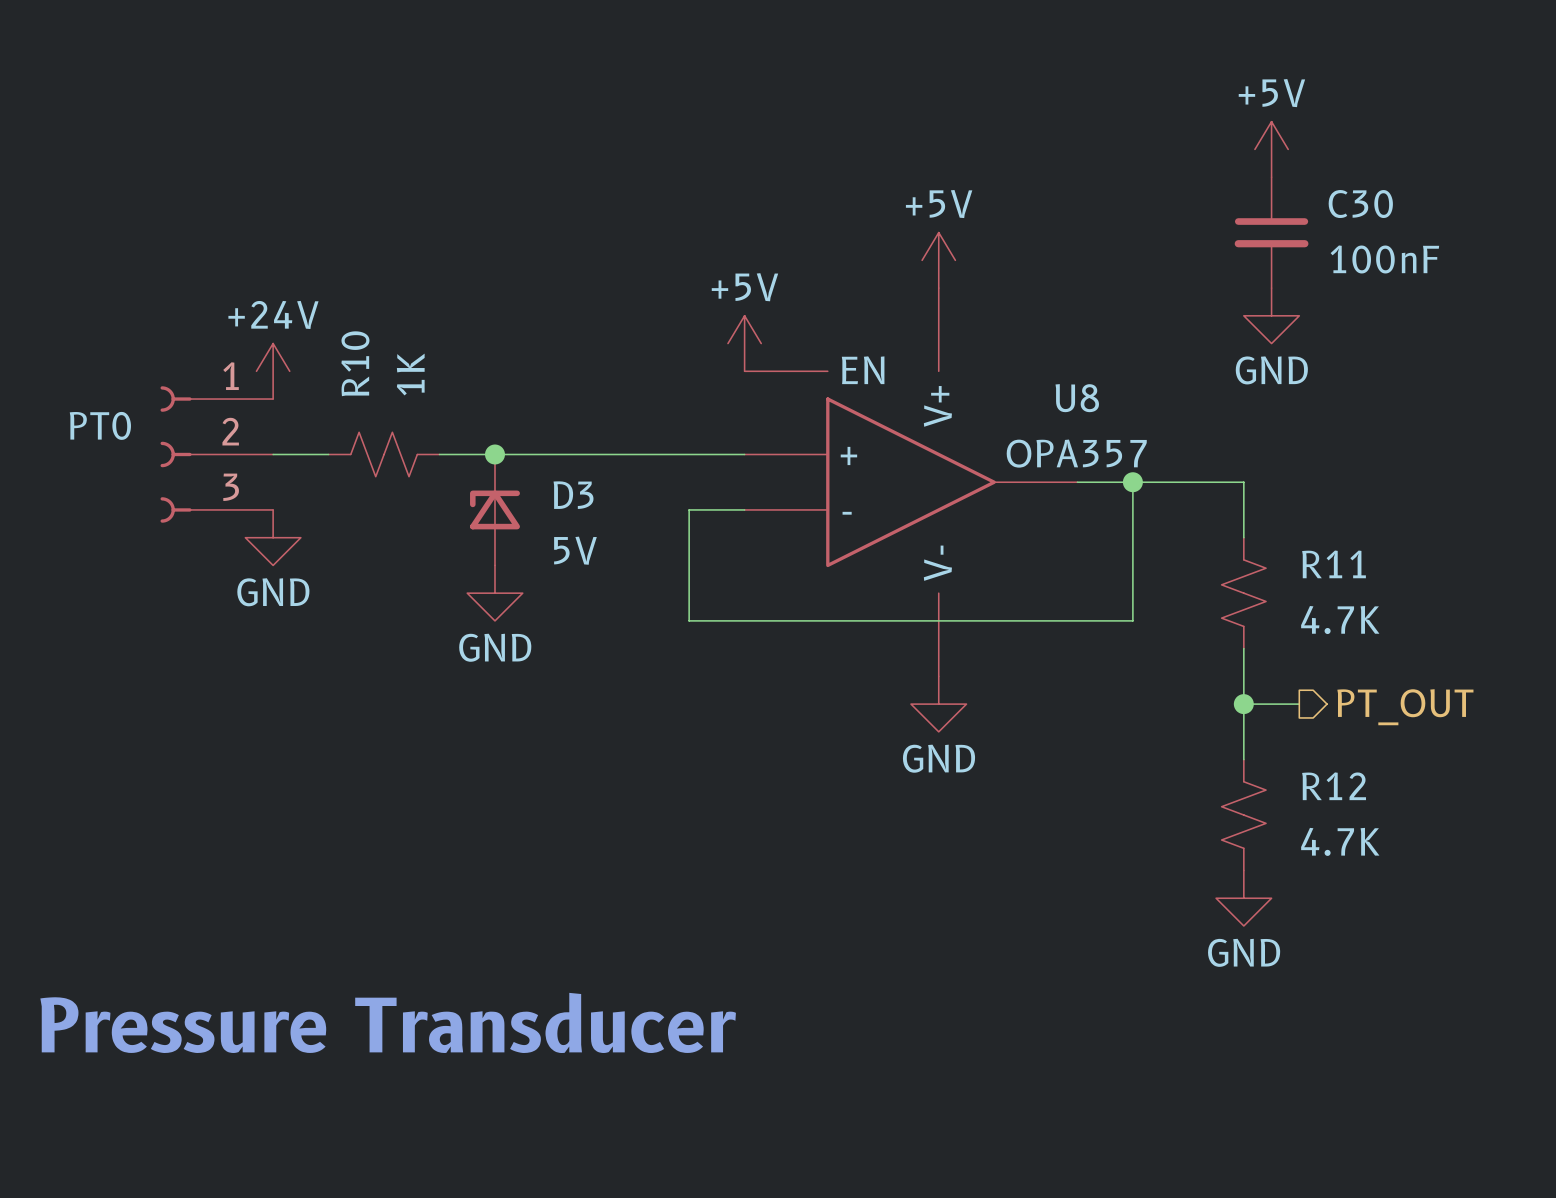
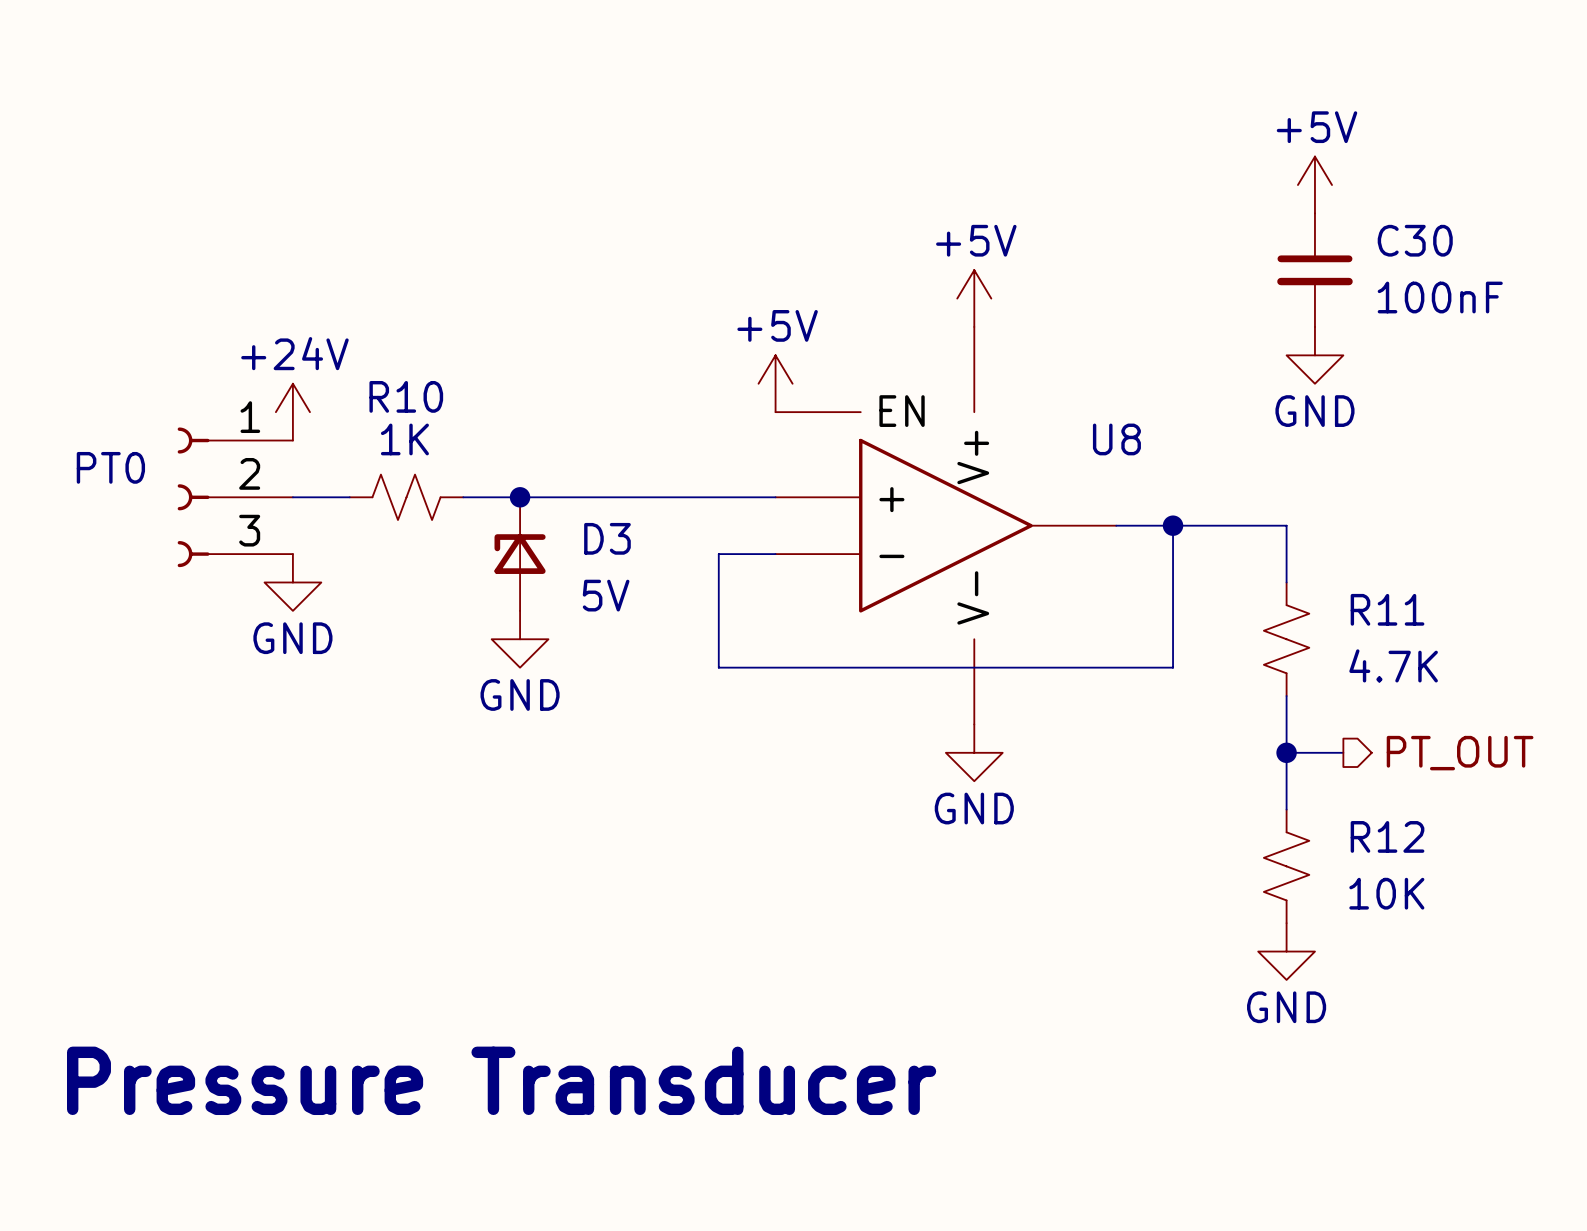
R10 name rotation: 0° (355, 363) -> 90° clockwise (406, 396)
R10 value rotation: 0° (410, 374) -> 90° clockwise (404, 439)
U8 value: OPA357 (1076, 453) -> none
R12 value: 4.7K (1340, 841) -> 10K (1386, 893)

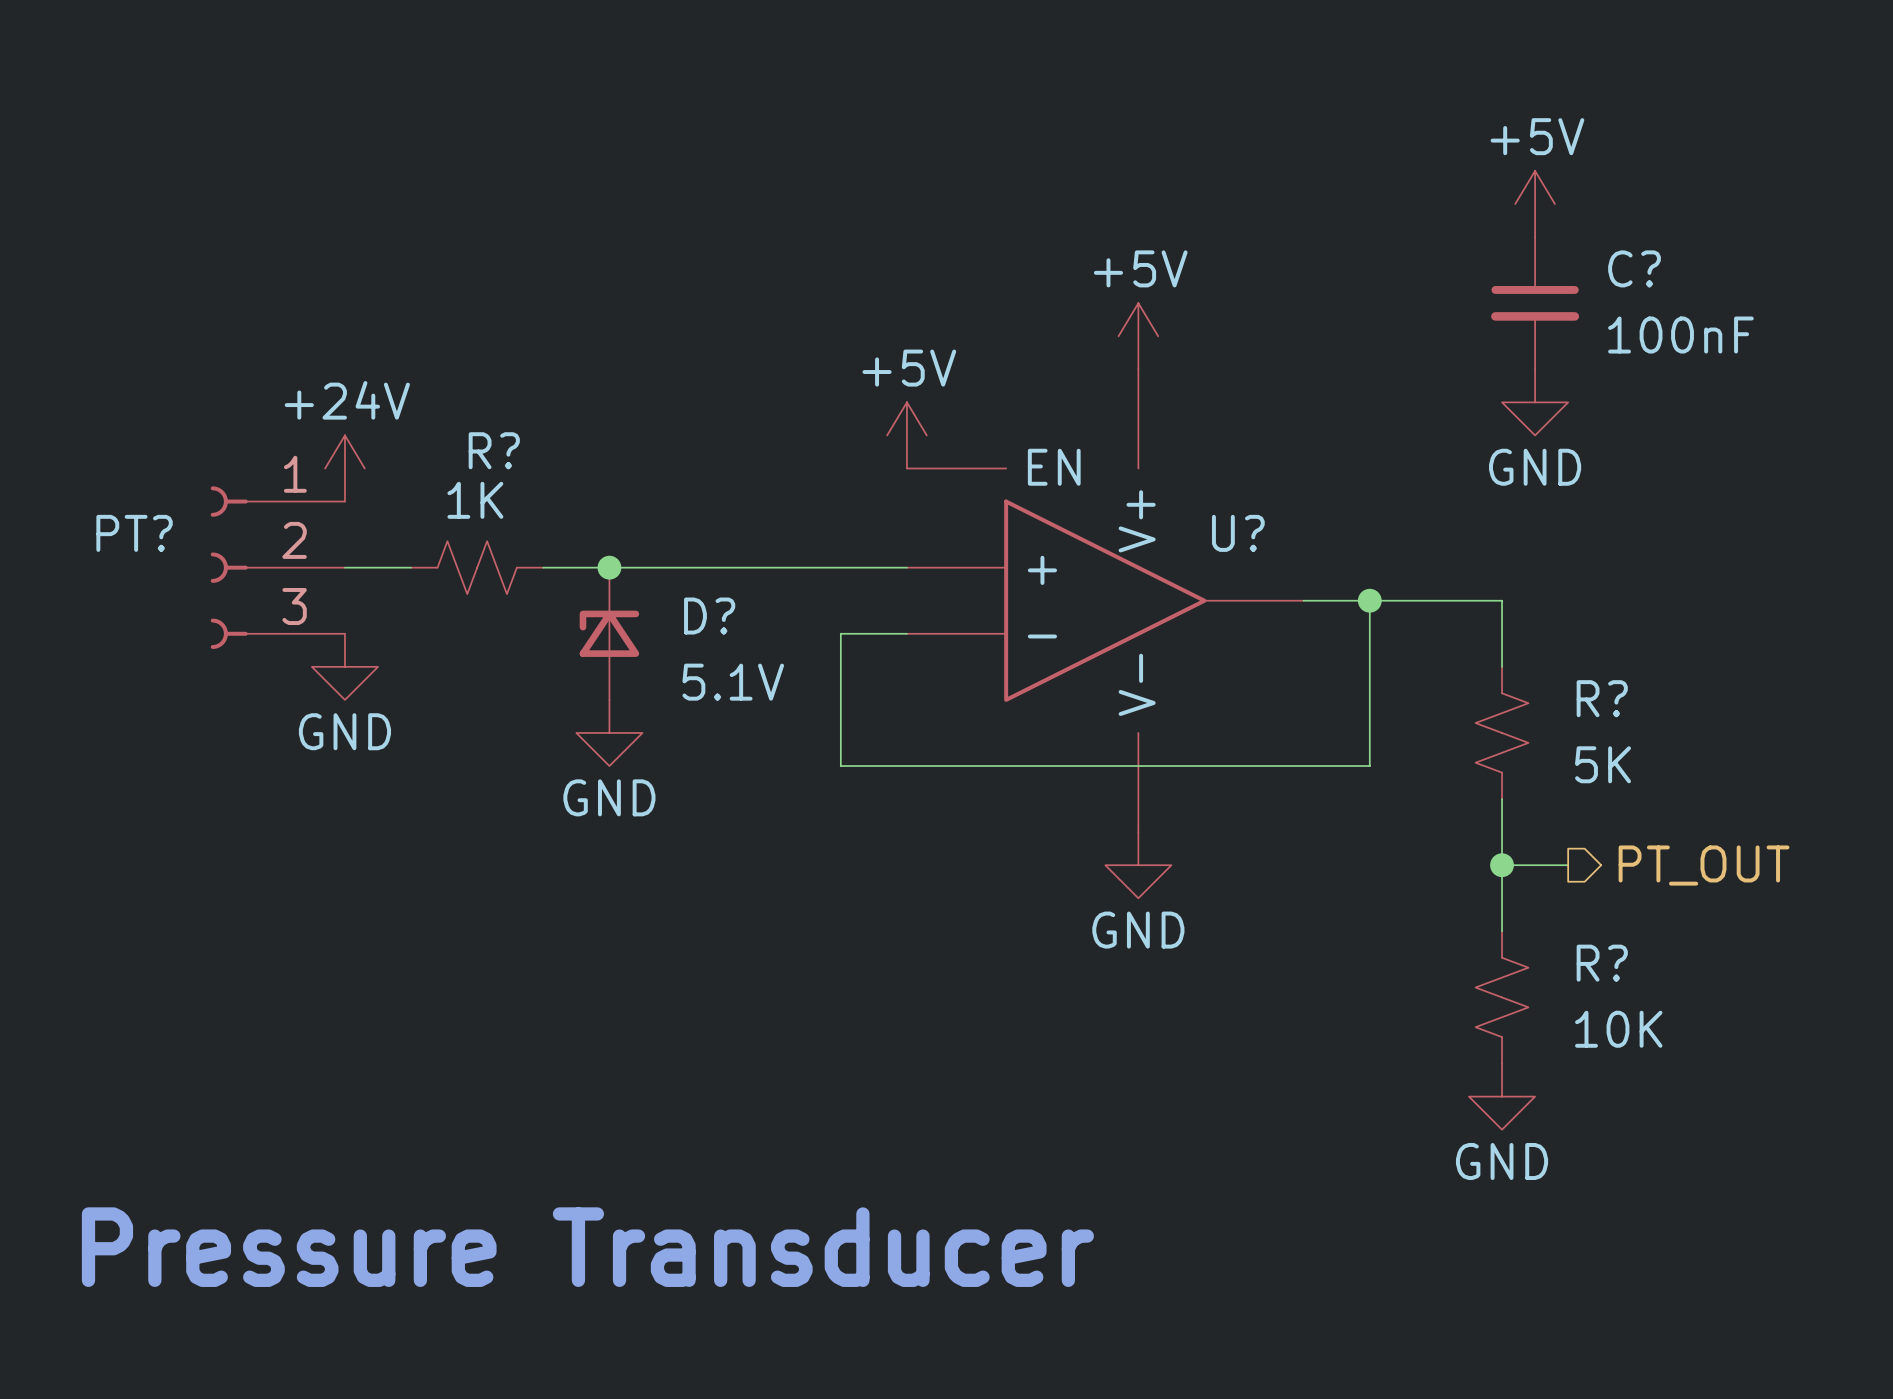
C30 name: C30 (1415, 240) -> C? (1634, 268)
R10 name: R10 (406, 396) -> R? (494, 450)
U8 name: U8 (1116, 439) -> U? (1238, 533)
PT0 name: PT0 (110, 467) -> PT? (134, 533)
D3 name: D3 (607, 538) -> D? (709, 616)
D3 value: 5V (606, 595) -> 5.1V (733, 682)
R11 name: R11 (1387, 609) -> R? (1602, 698)
R11 value: 4.7K (1393, 665) -> 5K (1603, 764)
R12 name: R12 (1387, 836) -> R? (1602, 963)

